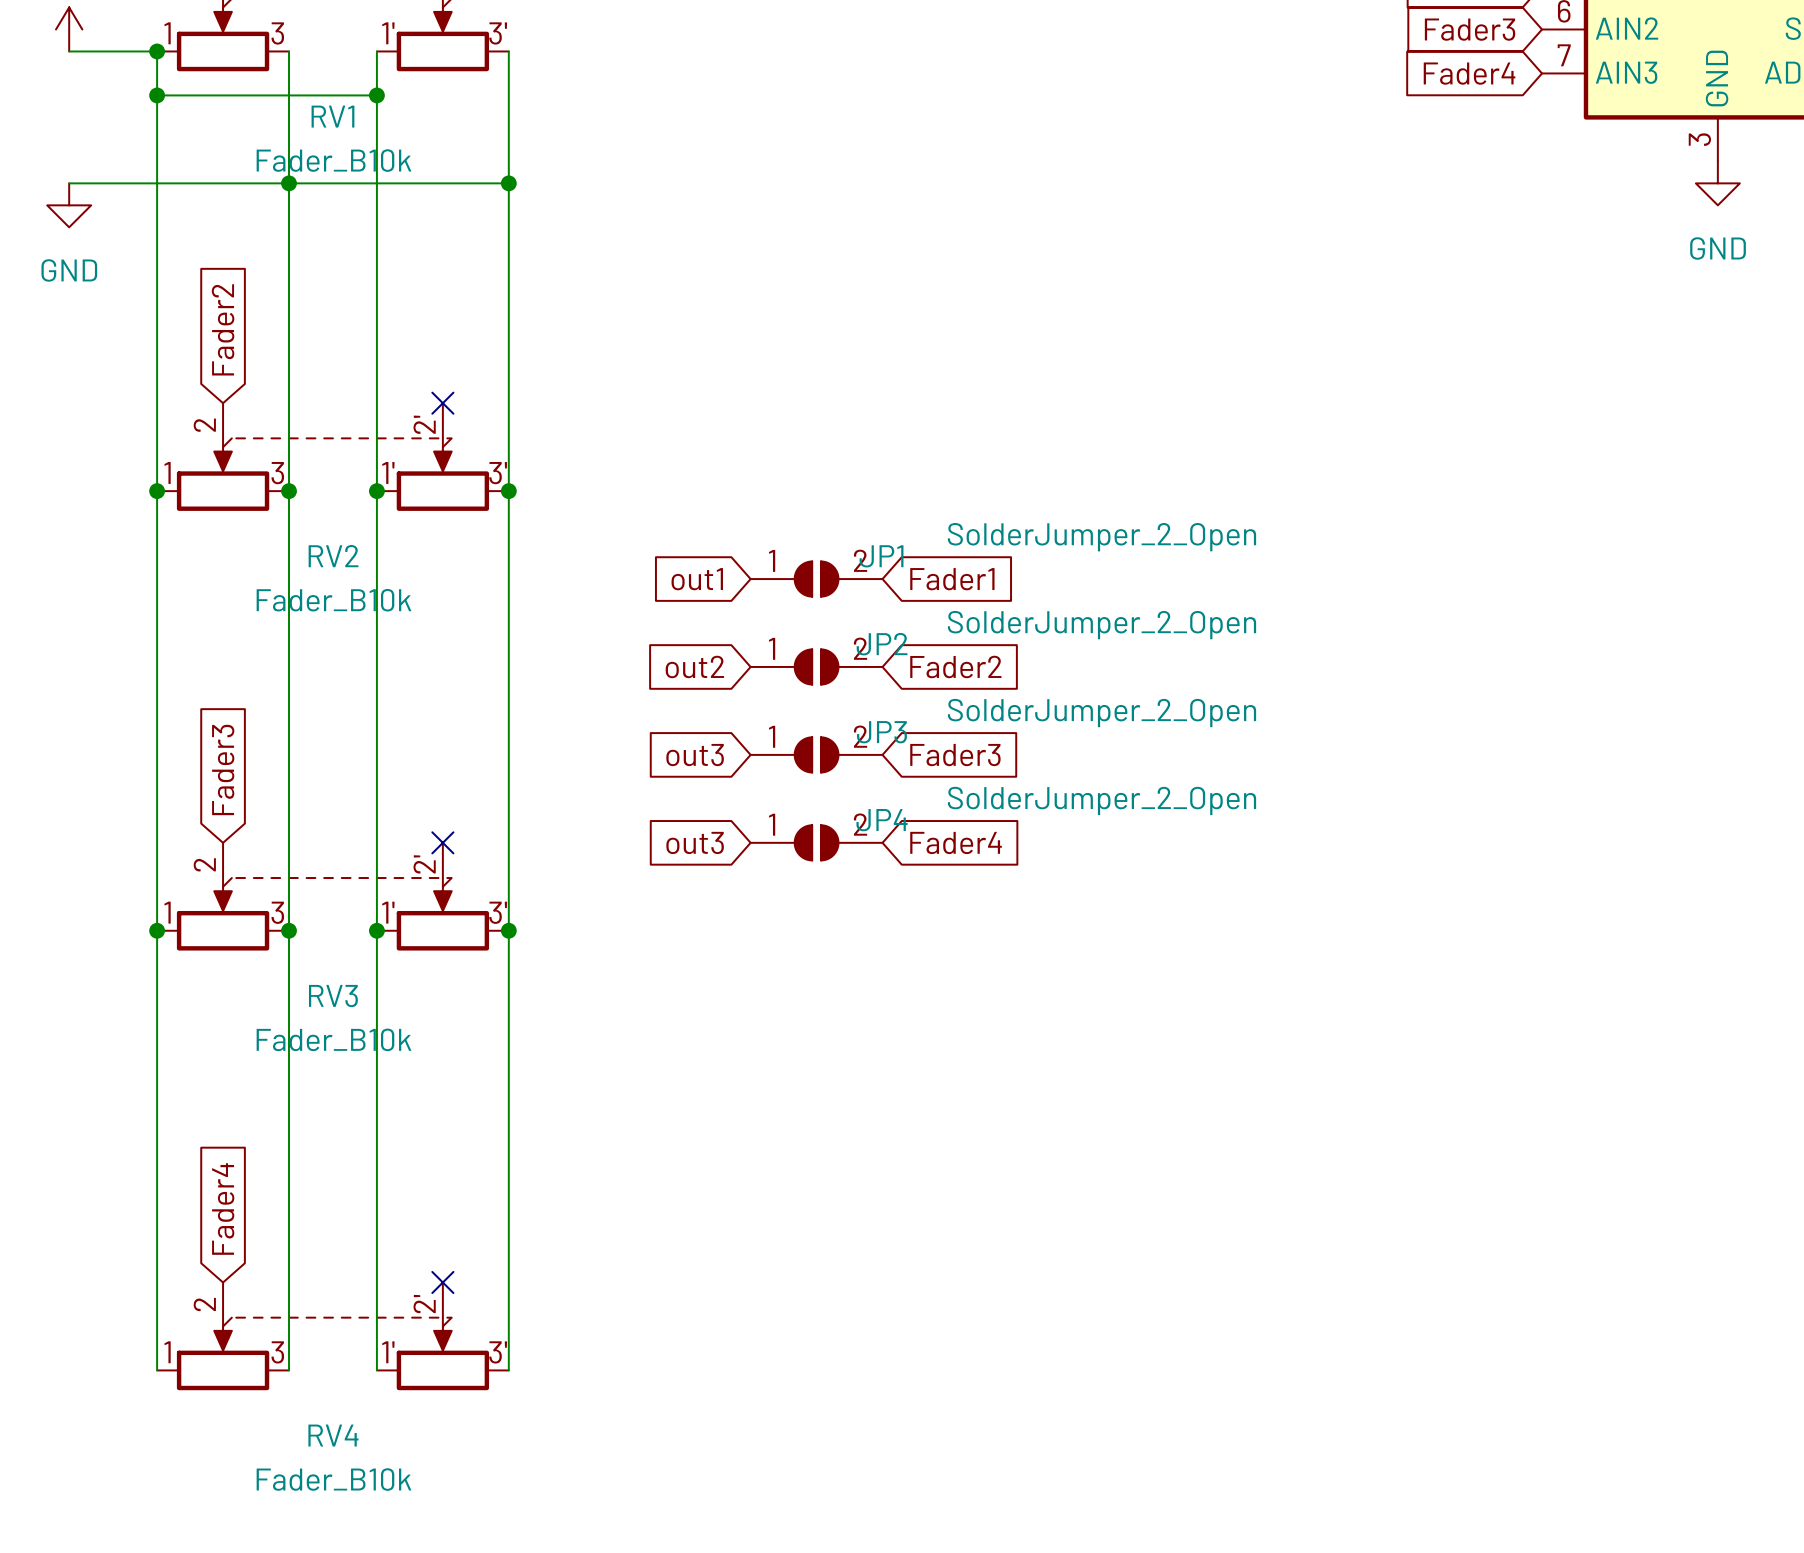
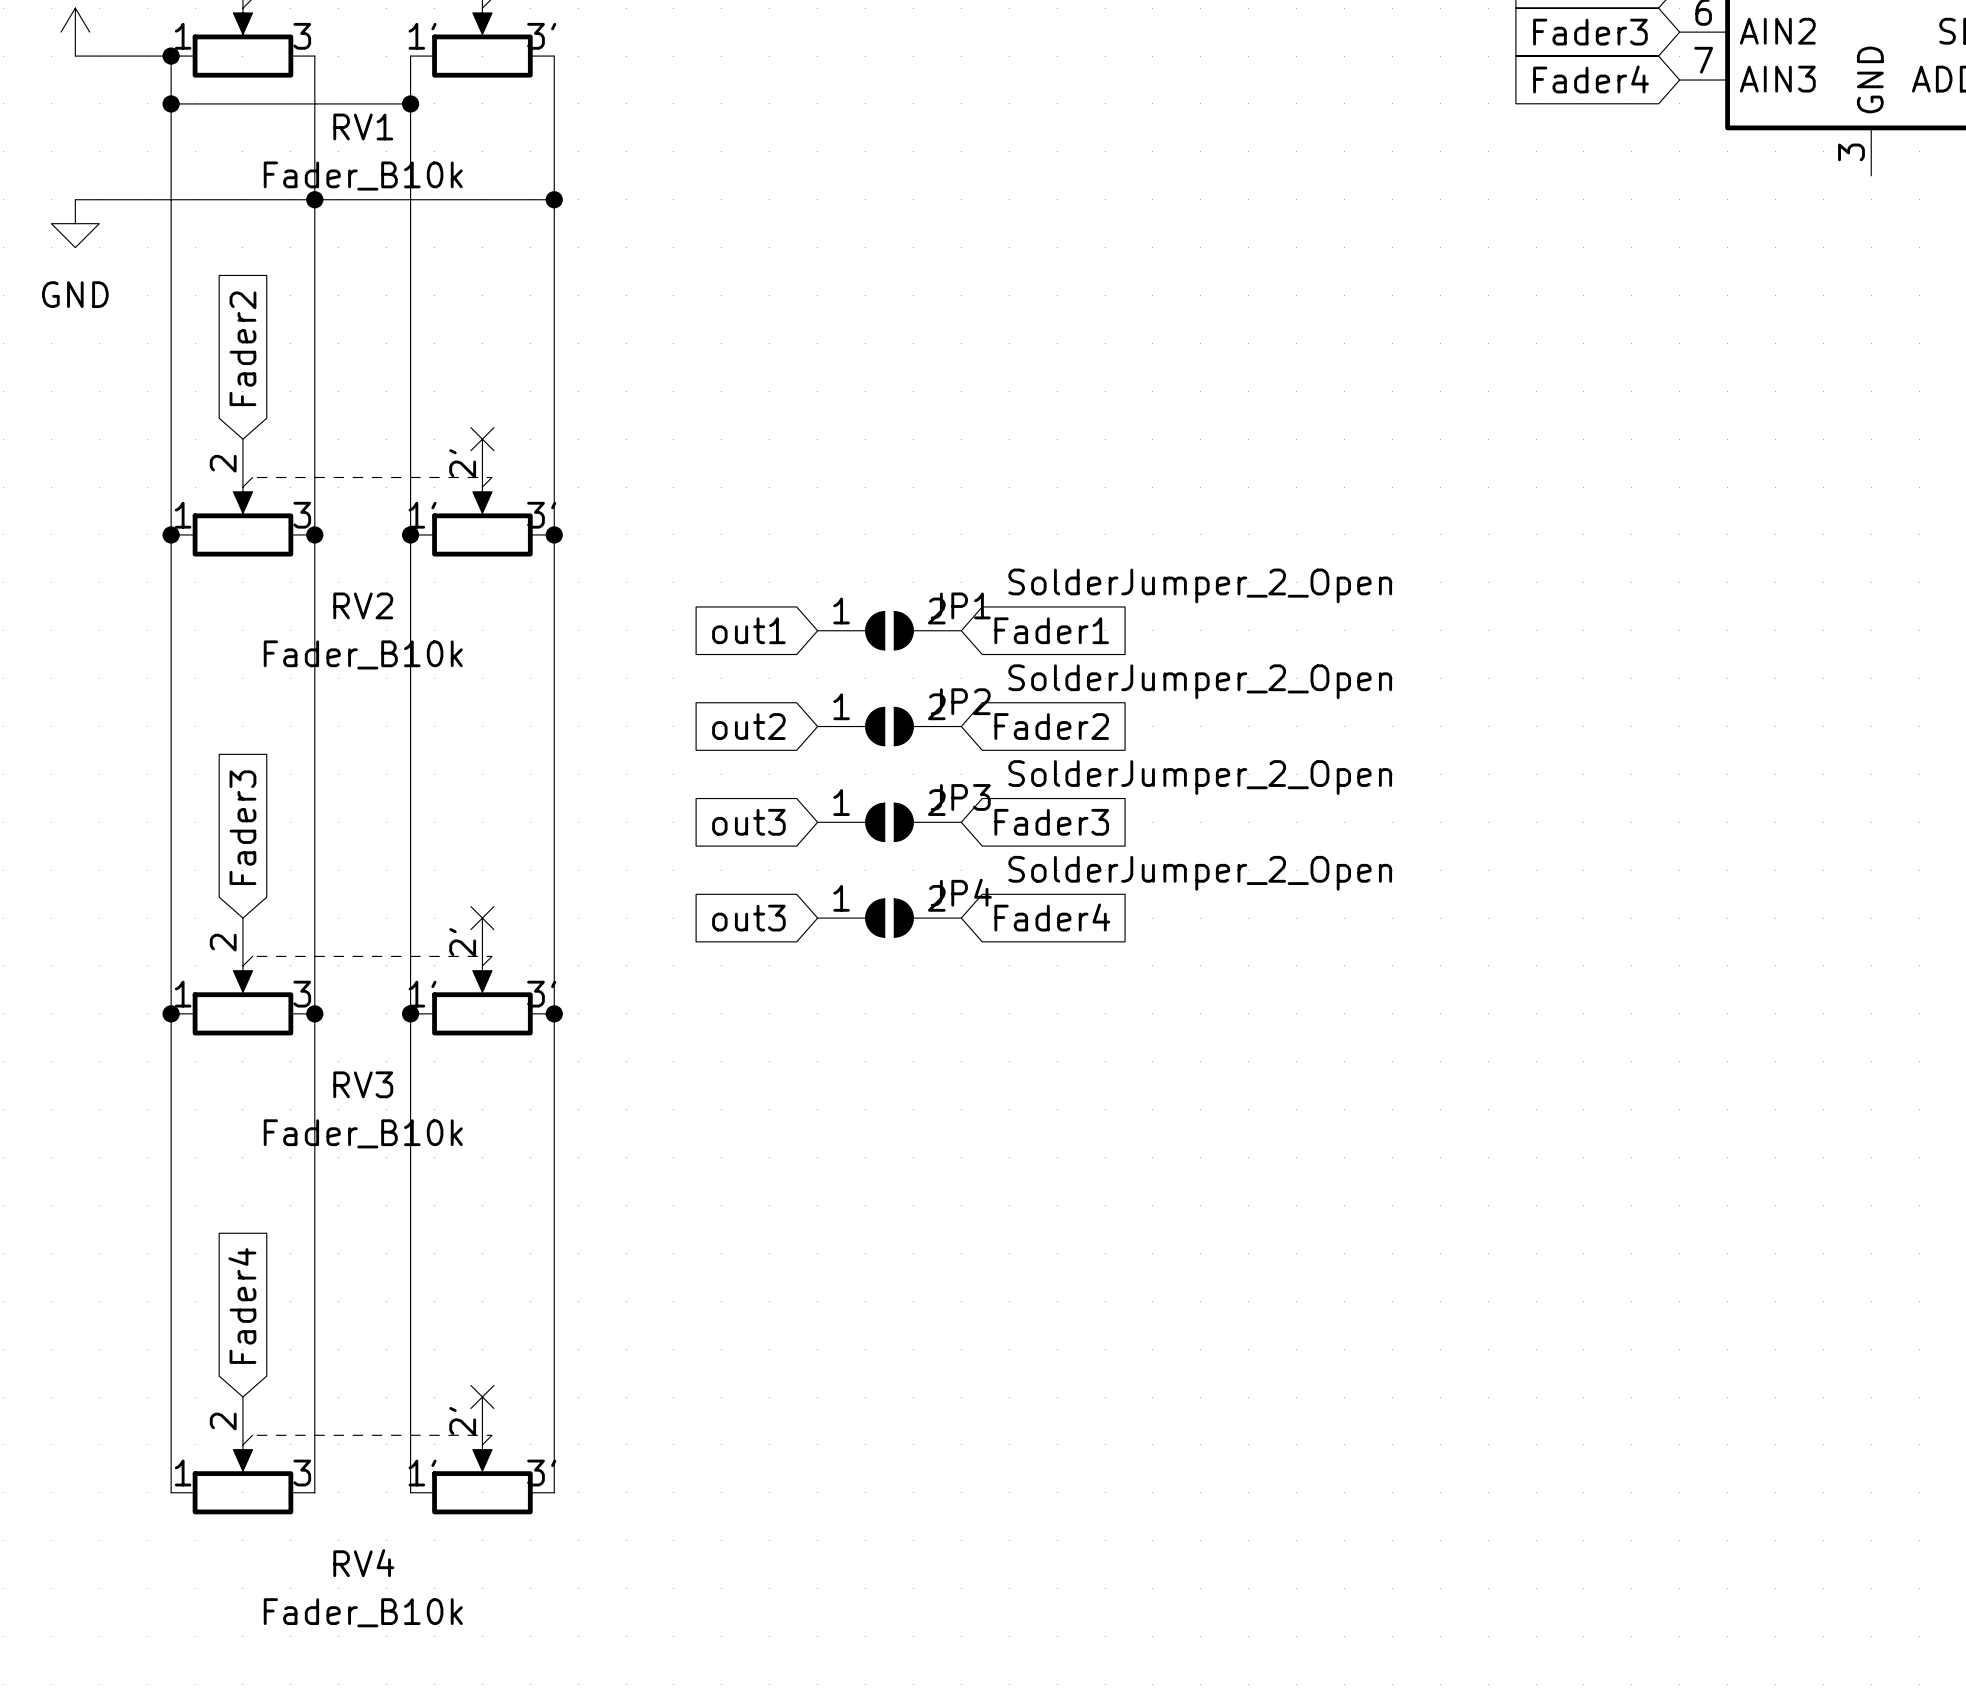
power symbol: GND (1717, 183) -> none

